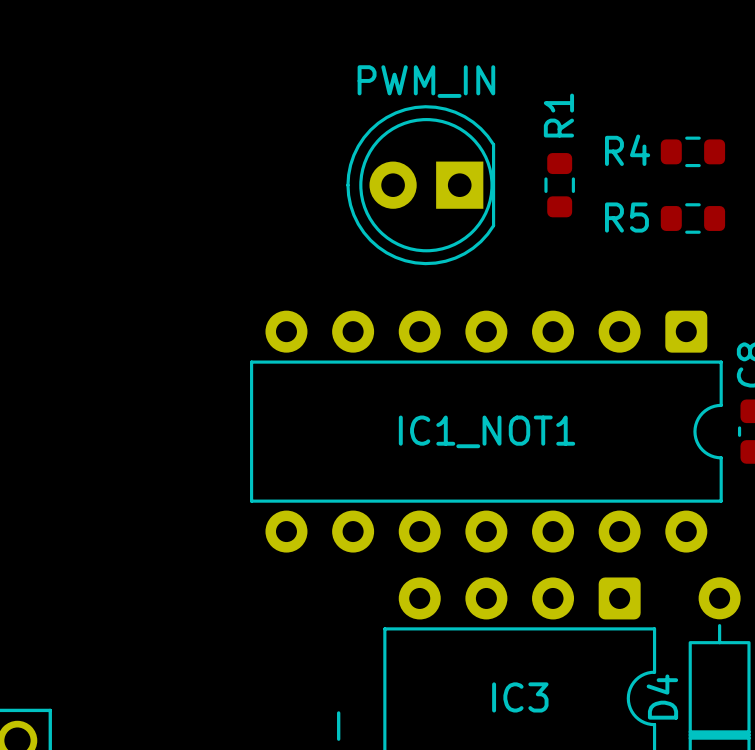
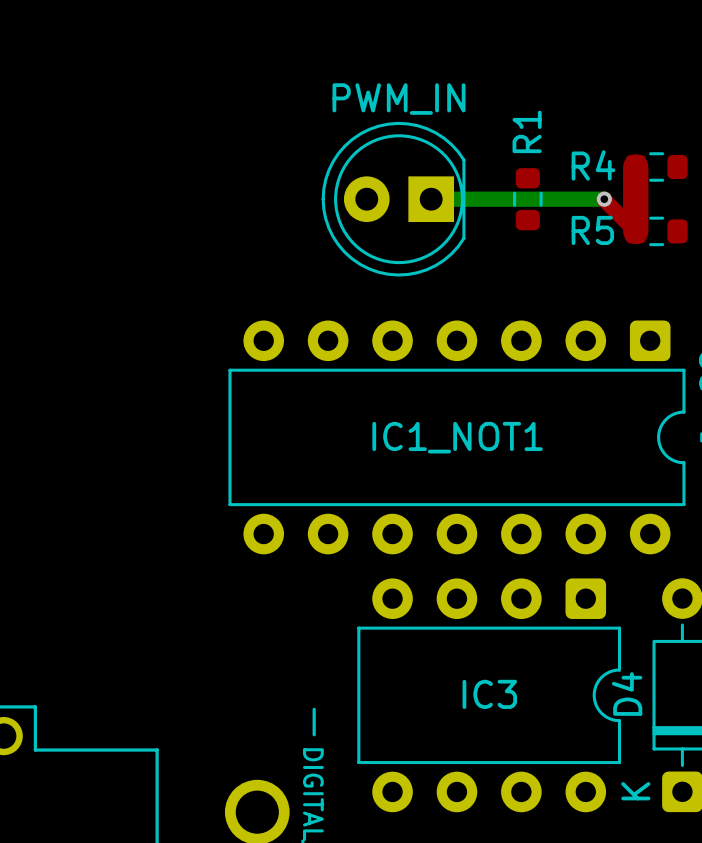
top track: none -> (635, 166) (635, 231) (604, 199)
bottom track: none -> (431, 199) (604, 199)
via: none -> (604, 199)

